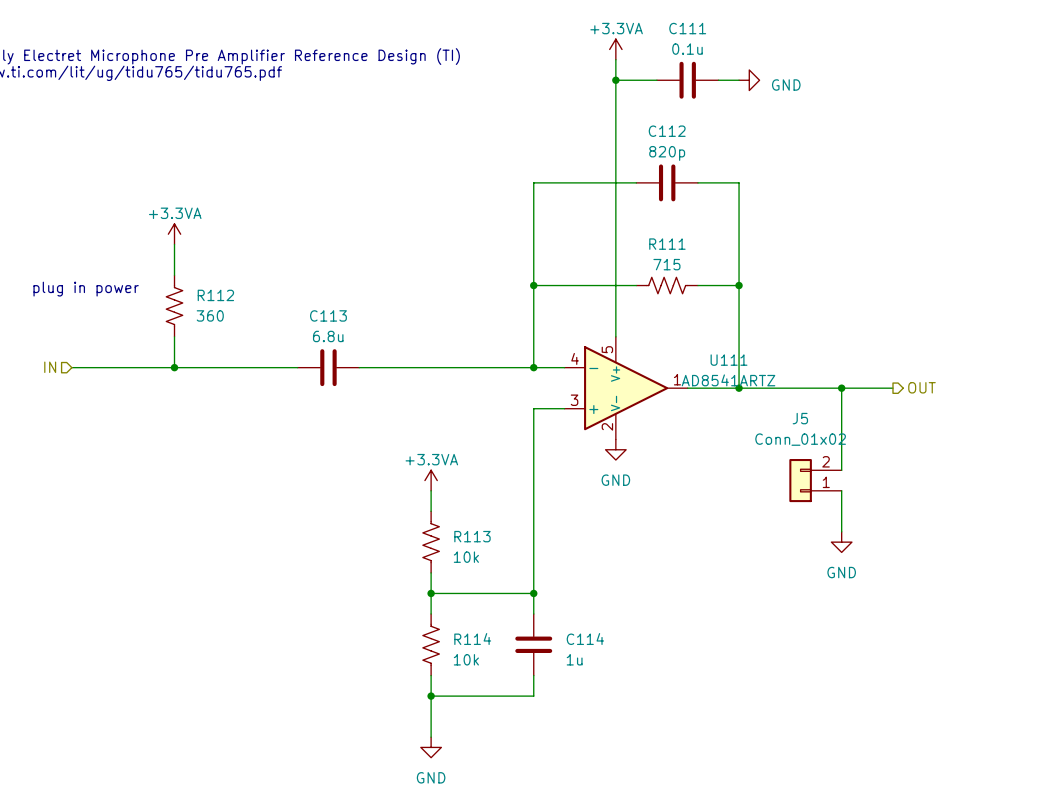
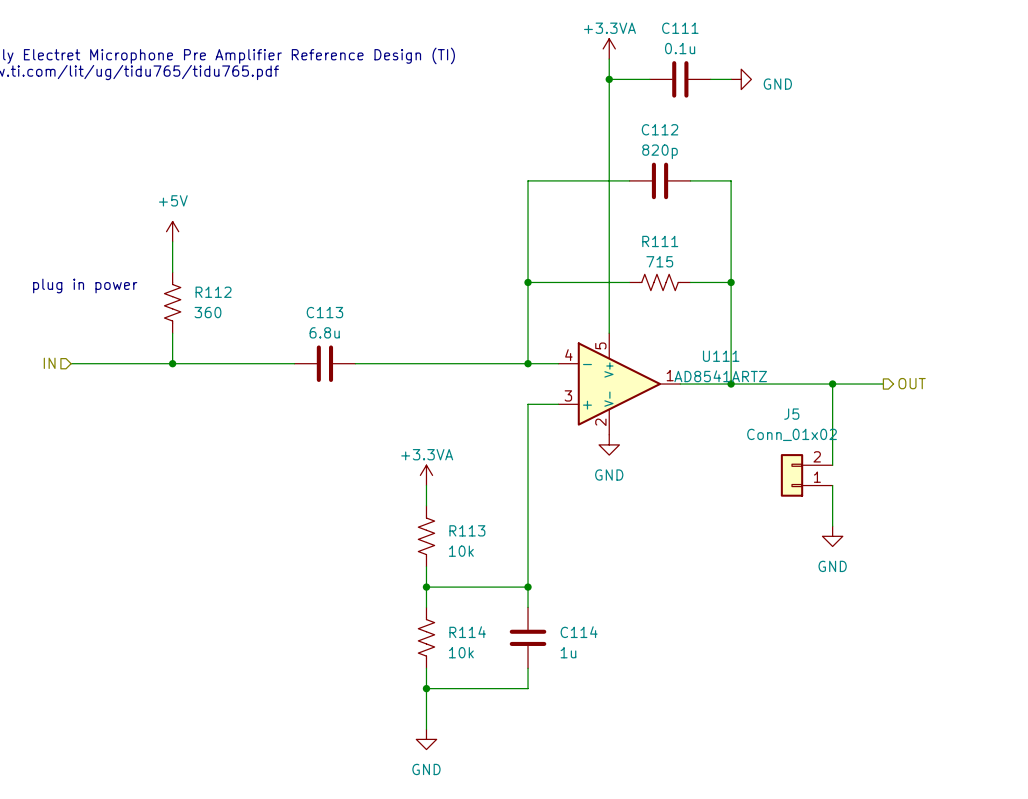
power symbol: +3.3VA (174, 234) -> +5V (172, 231)

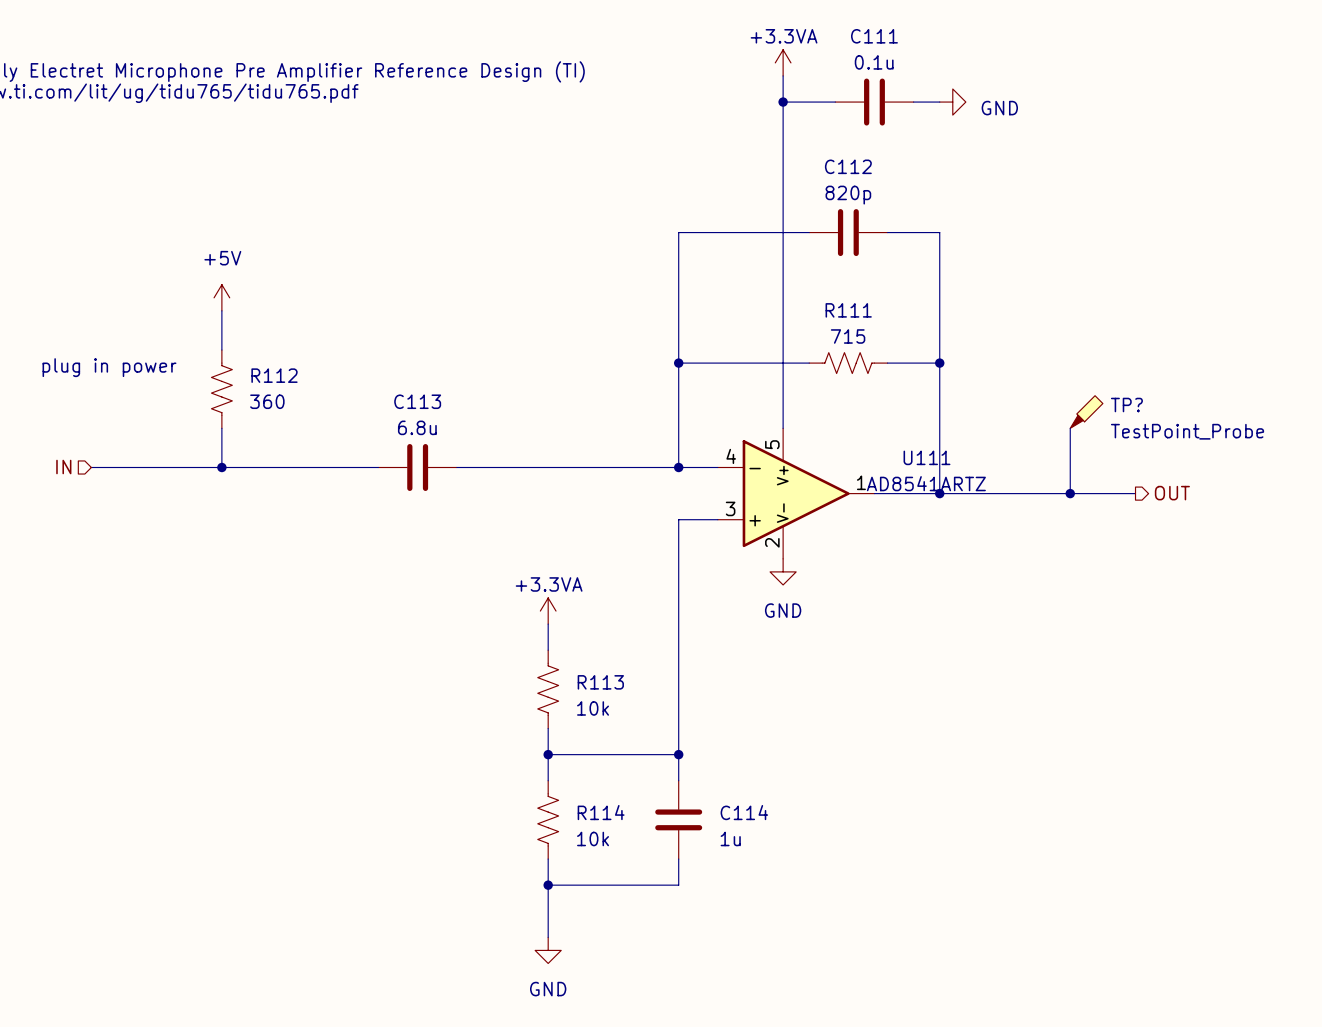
TP?: none -> TestPoint_Probe (1086, 412)
wire: (832, 384) (832, 465) -> (1070, 493) (1070, 428)
J5: Conn_01x02 (806, 475) -> none
wire: (832, 485) (832, 526) -> none
power symbol: GND (832, 536) -> none

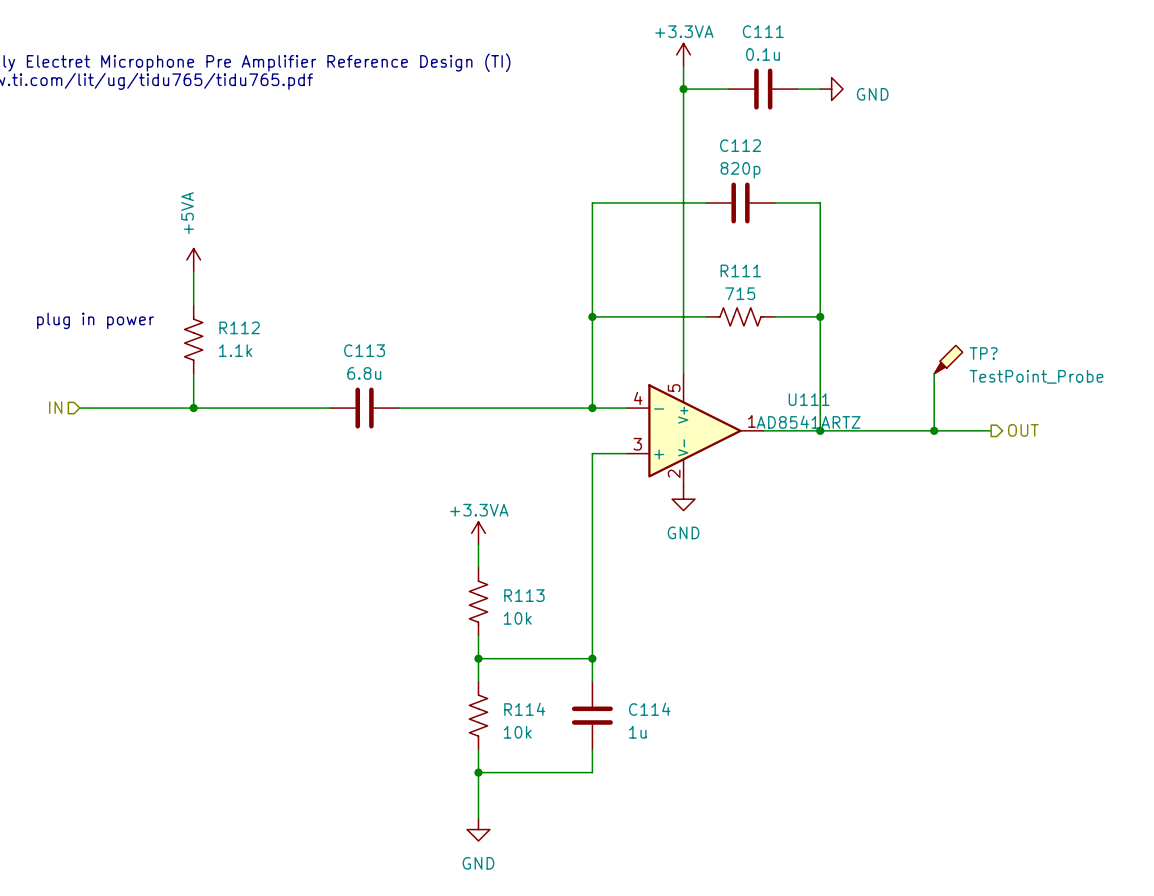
power symbol: +5V (221, 297) -> +5VA (193, 259)
R112 value: 360 (267, 401) -> 1.1k (235, 350)

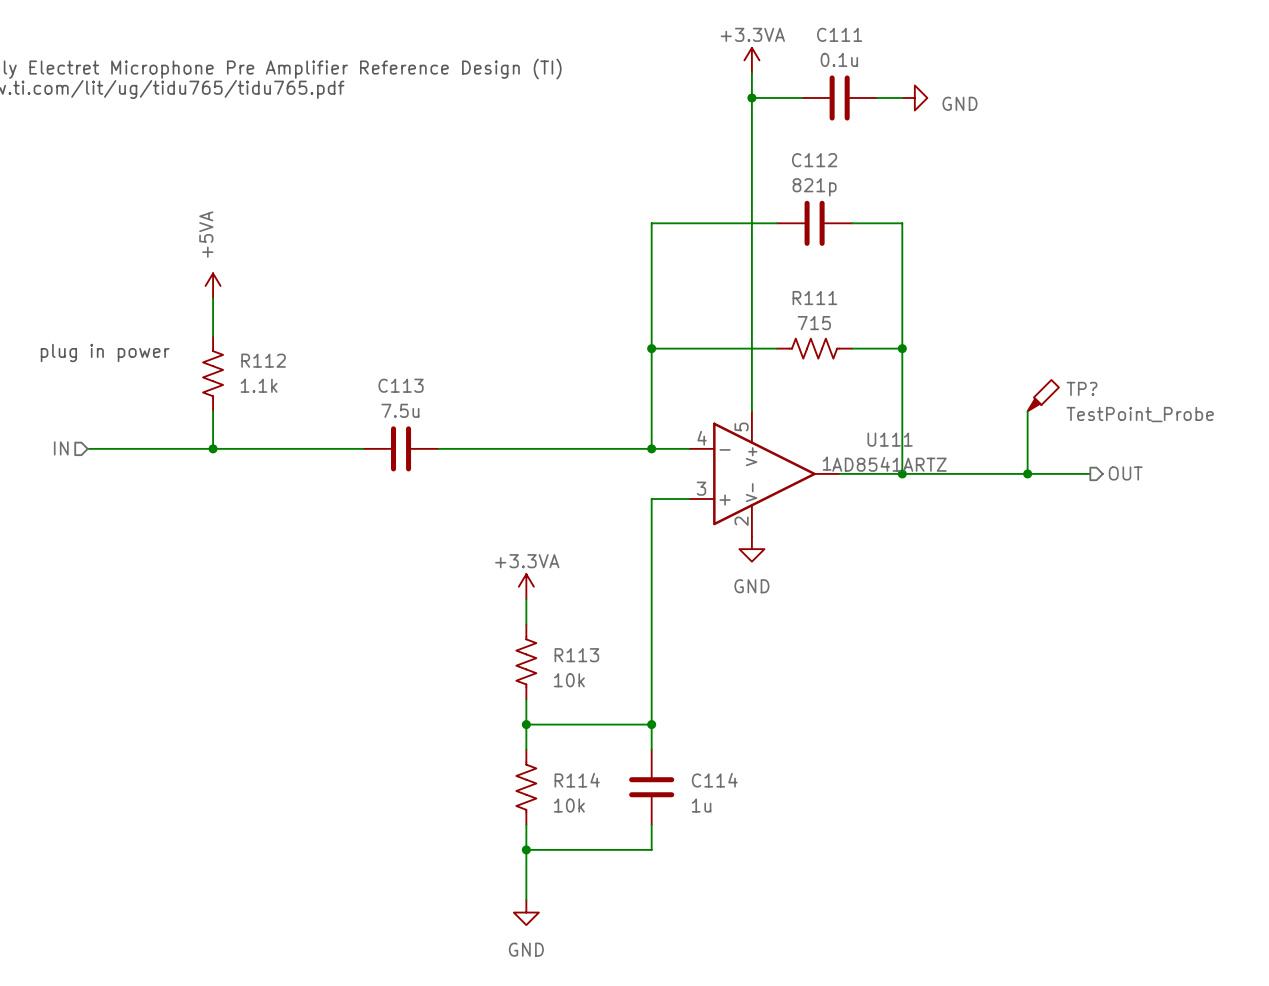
C112 value: 820p (740, 170) -> 821p (814, 187)
C113 value: 6.8u (364, 373) -> 7.5u (400, 410)

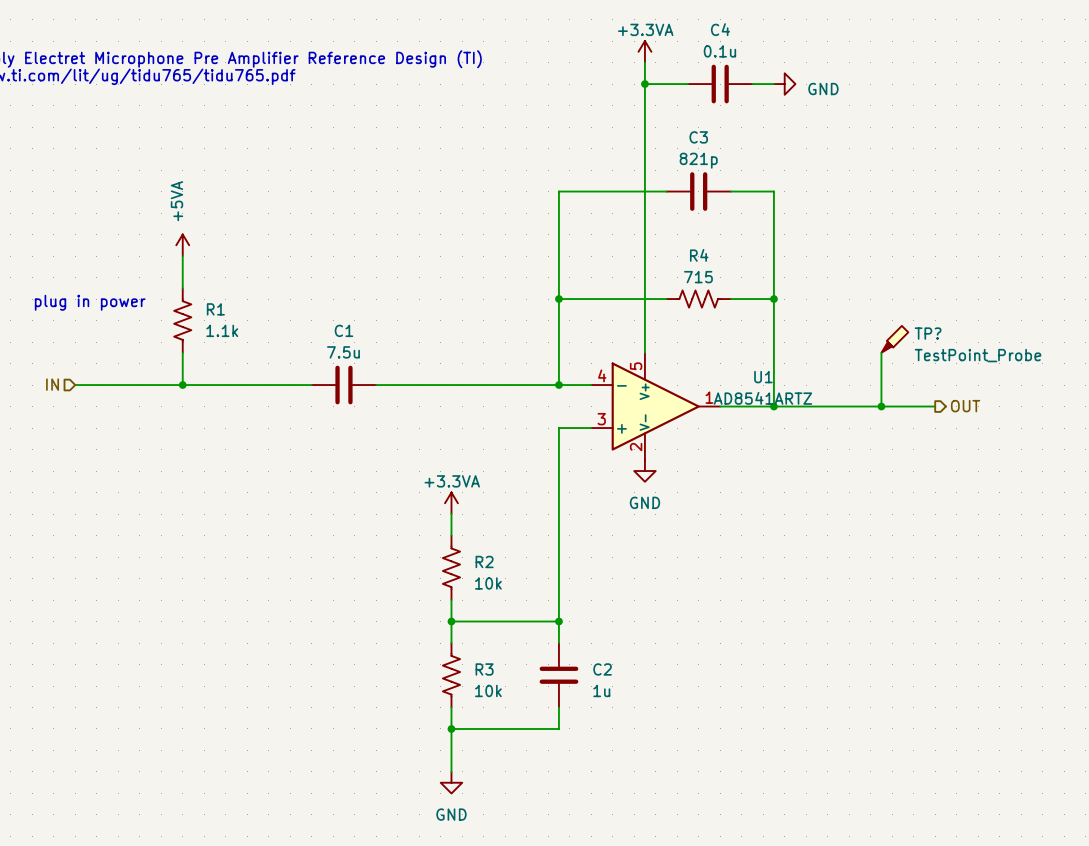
C111 name: C111 (839, 34) -> C4 (720, 29)
C112 name: C112 (814, 160) -> C3 (698, 137)
R111 name: R111 (814, 298) -> R4 (699, 255)
R112 name: R112 (263, 360) -> R1 (215, 309)
C113 name: C113 (401, 385) -> C1 (343, 330)
U111 name: U111 (890, 439) -> U1 (763, 377)
R113 name: R113 (576, 655) -> R2 (484, 561)
R114 name: R114 (577, 780) -> R3 (484, 669)
C114 name: C114 (714, 780) -> C2 (602, 669)

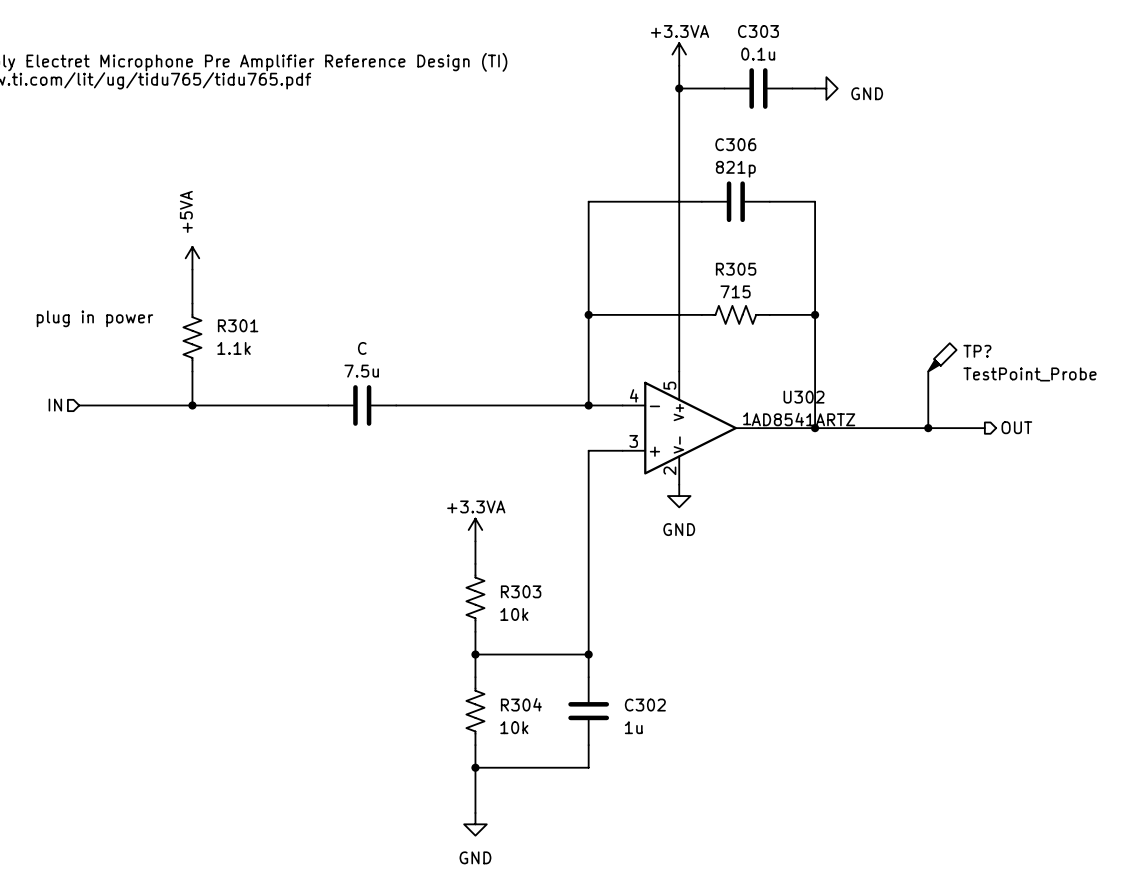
C4 name: C4 (720, 29) -> C303 (758, 31)
C3 name: C3 (698, 137) -> C306 (735, 144)
R4 name: R4 (699, 255) -> R305 (736, 269)
R1 name: R1 (215, 309) -> R301 (238, 325)
C1 name: C1 (343, 330) -> C (362, 348)
U1 name: U1 (763, 377) -> U302 (804, 397)
R2 name: R2 (484, 561) -> R303 (521, 591)
R3 name: R3 (484, 669) -> R304 (521, 704)
C2 name: C2 (602, 669) -> C302 (645, 705)

